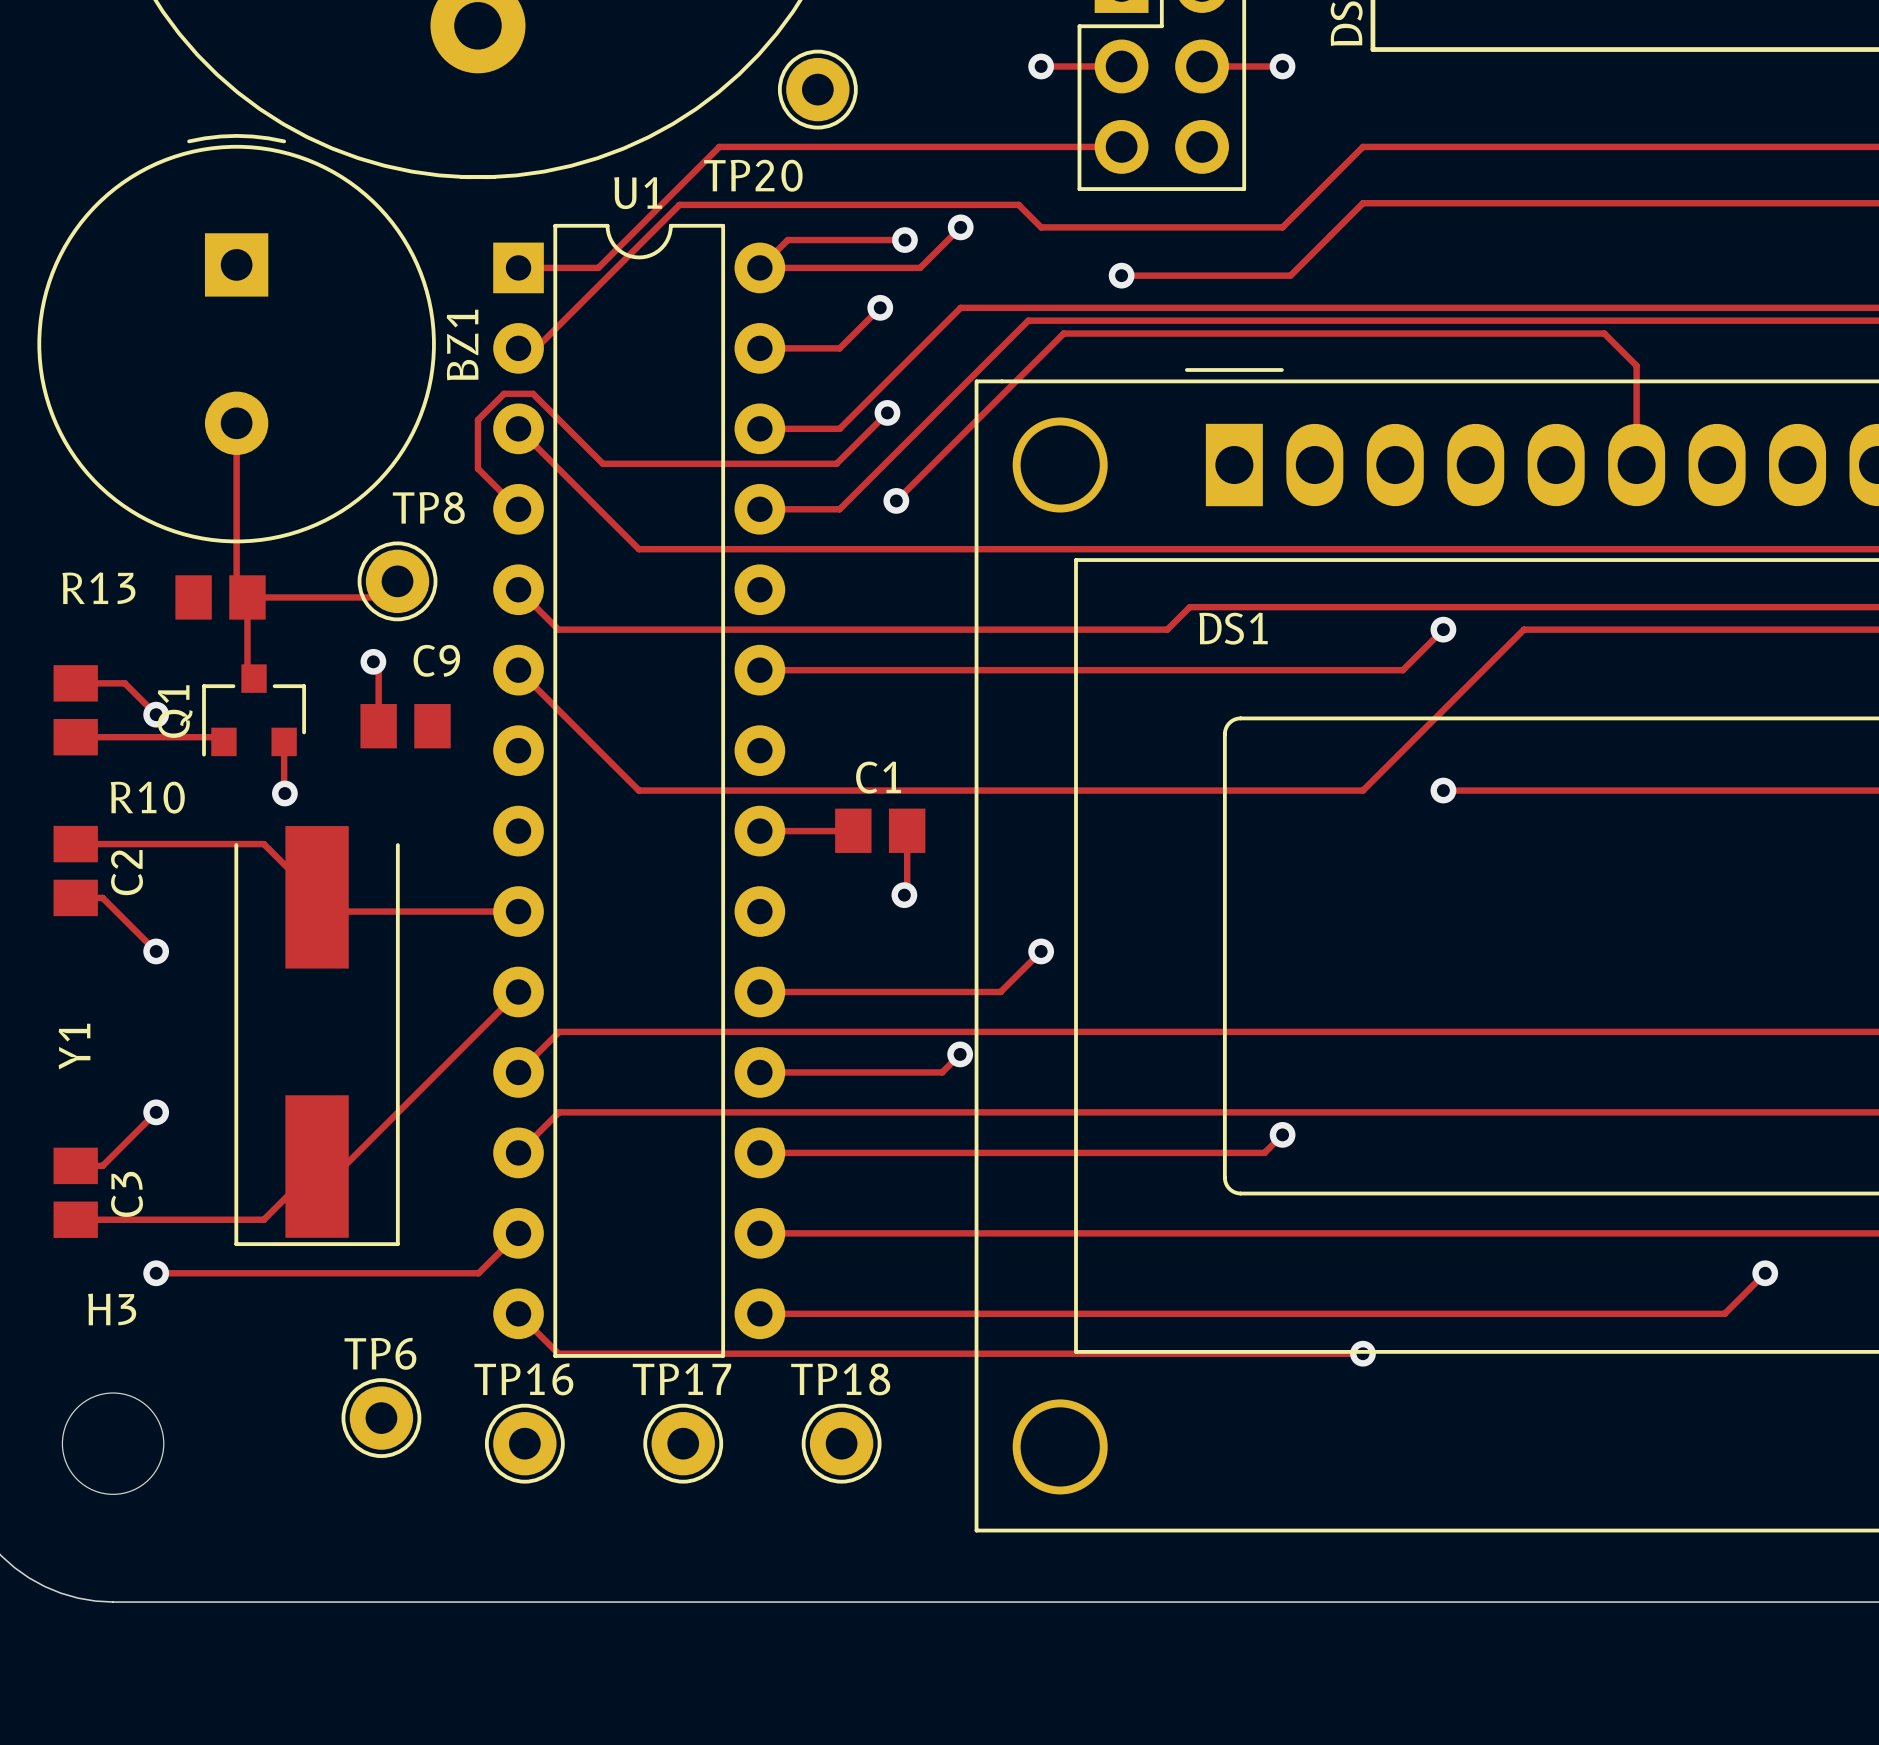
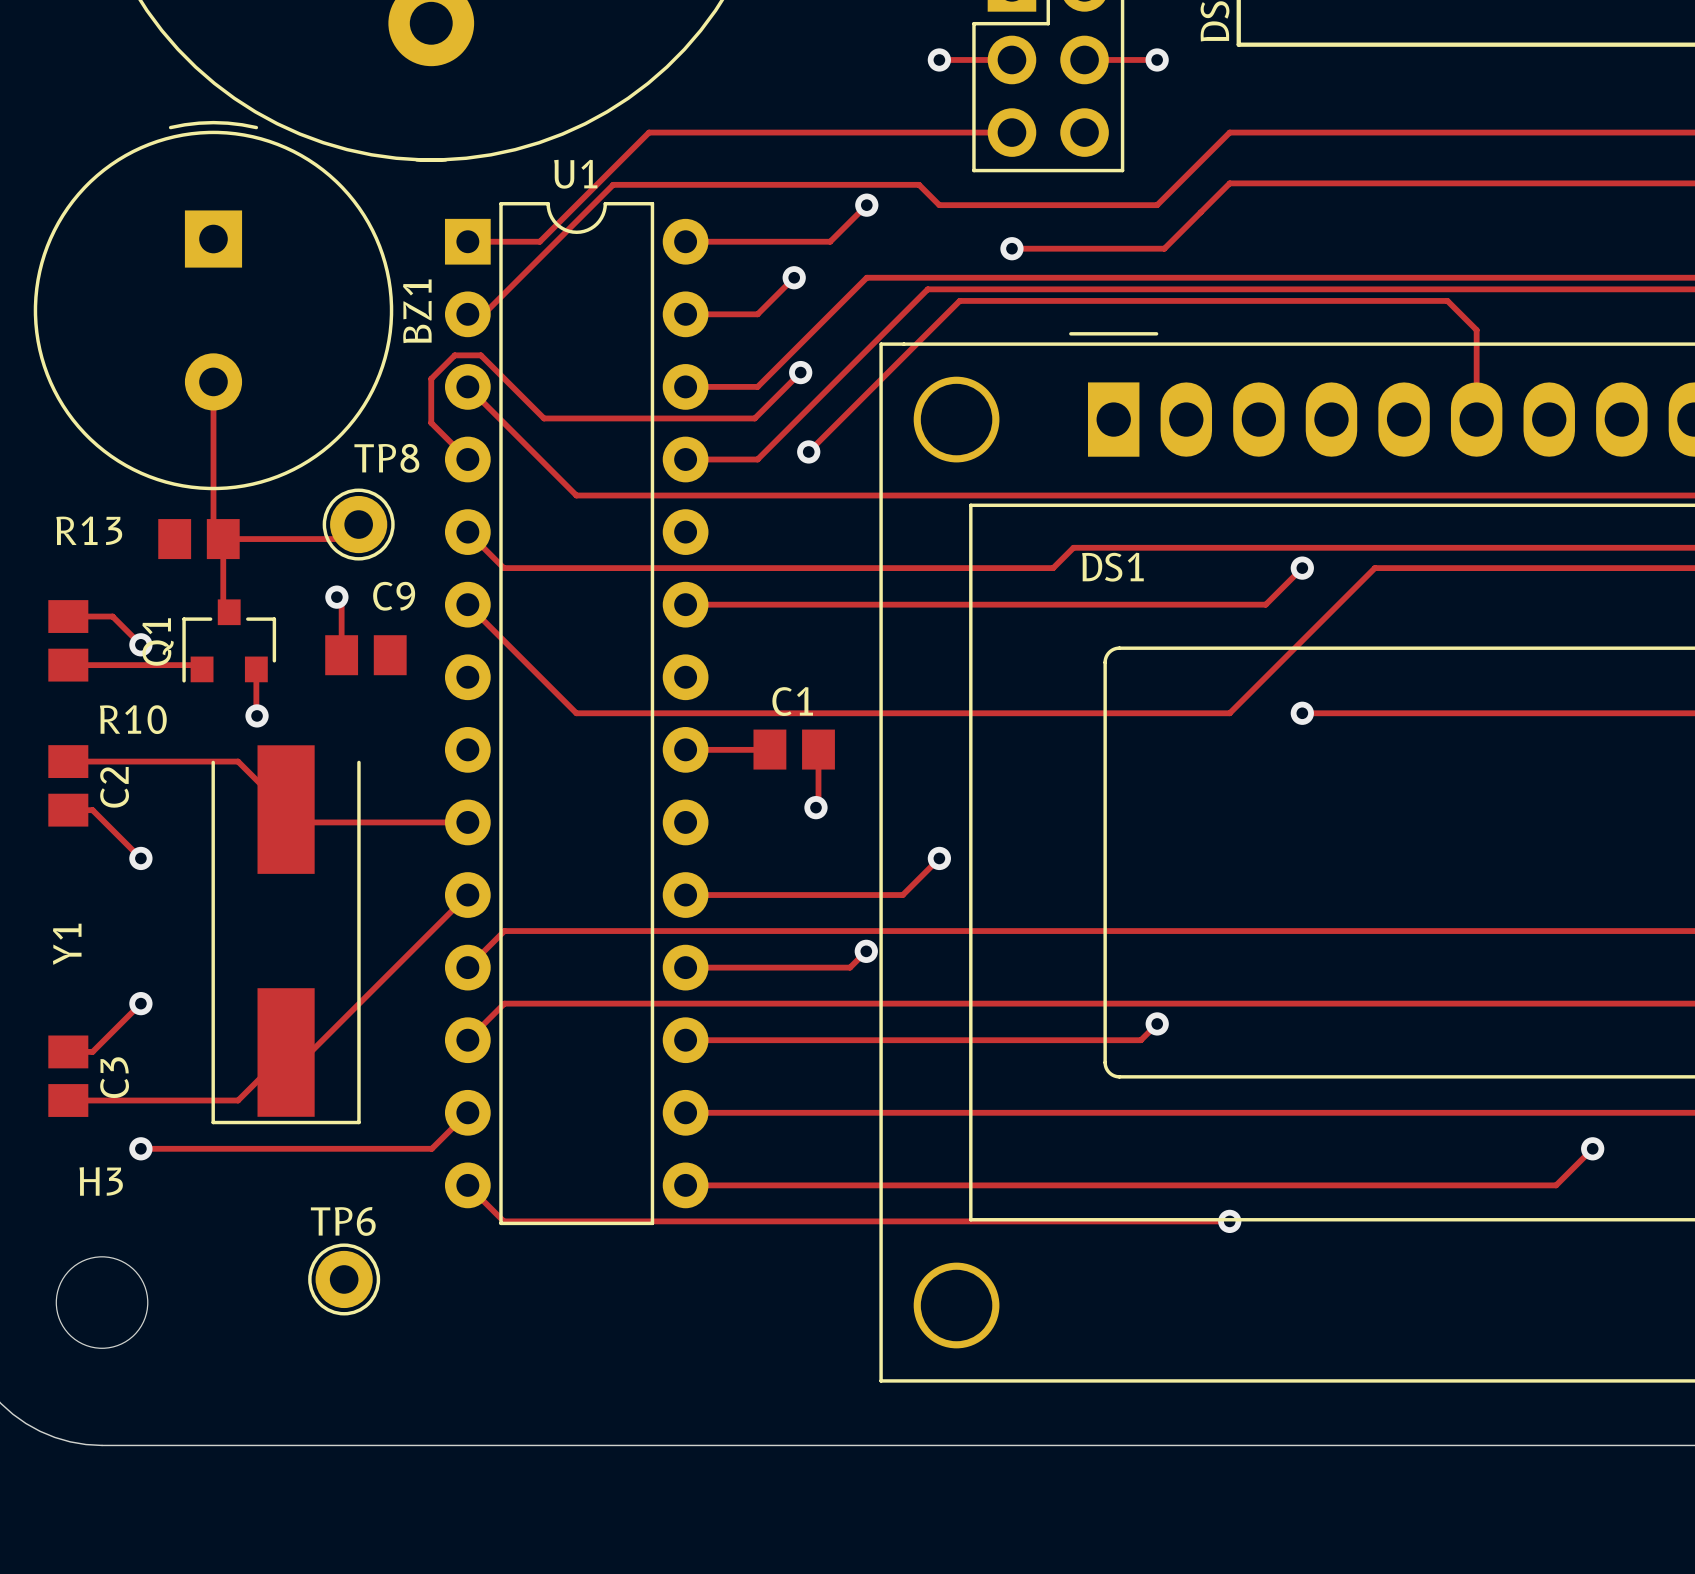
TP20: (817, 89) -> none
track: (904, 240) (787, 240) (759, 267) -> none
via: (904, 240) -> none
TP16: (524, 1443) -> none
TP17: (683, 1443) -> none
TP18: (841, 1443) -> none

